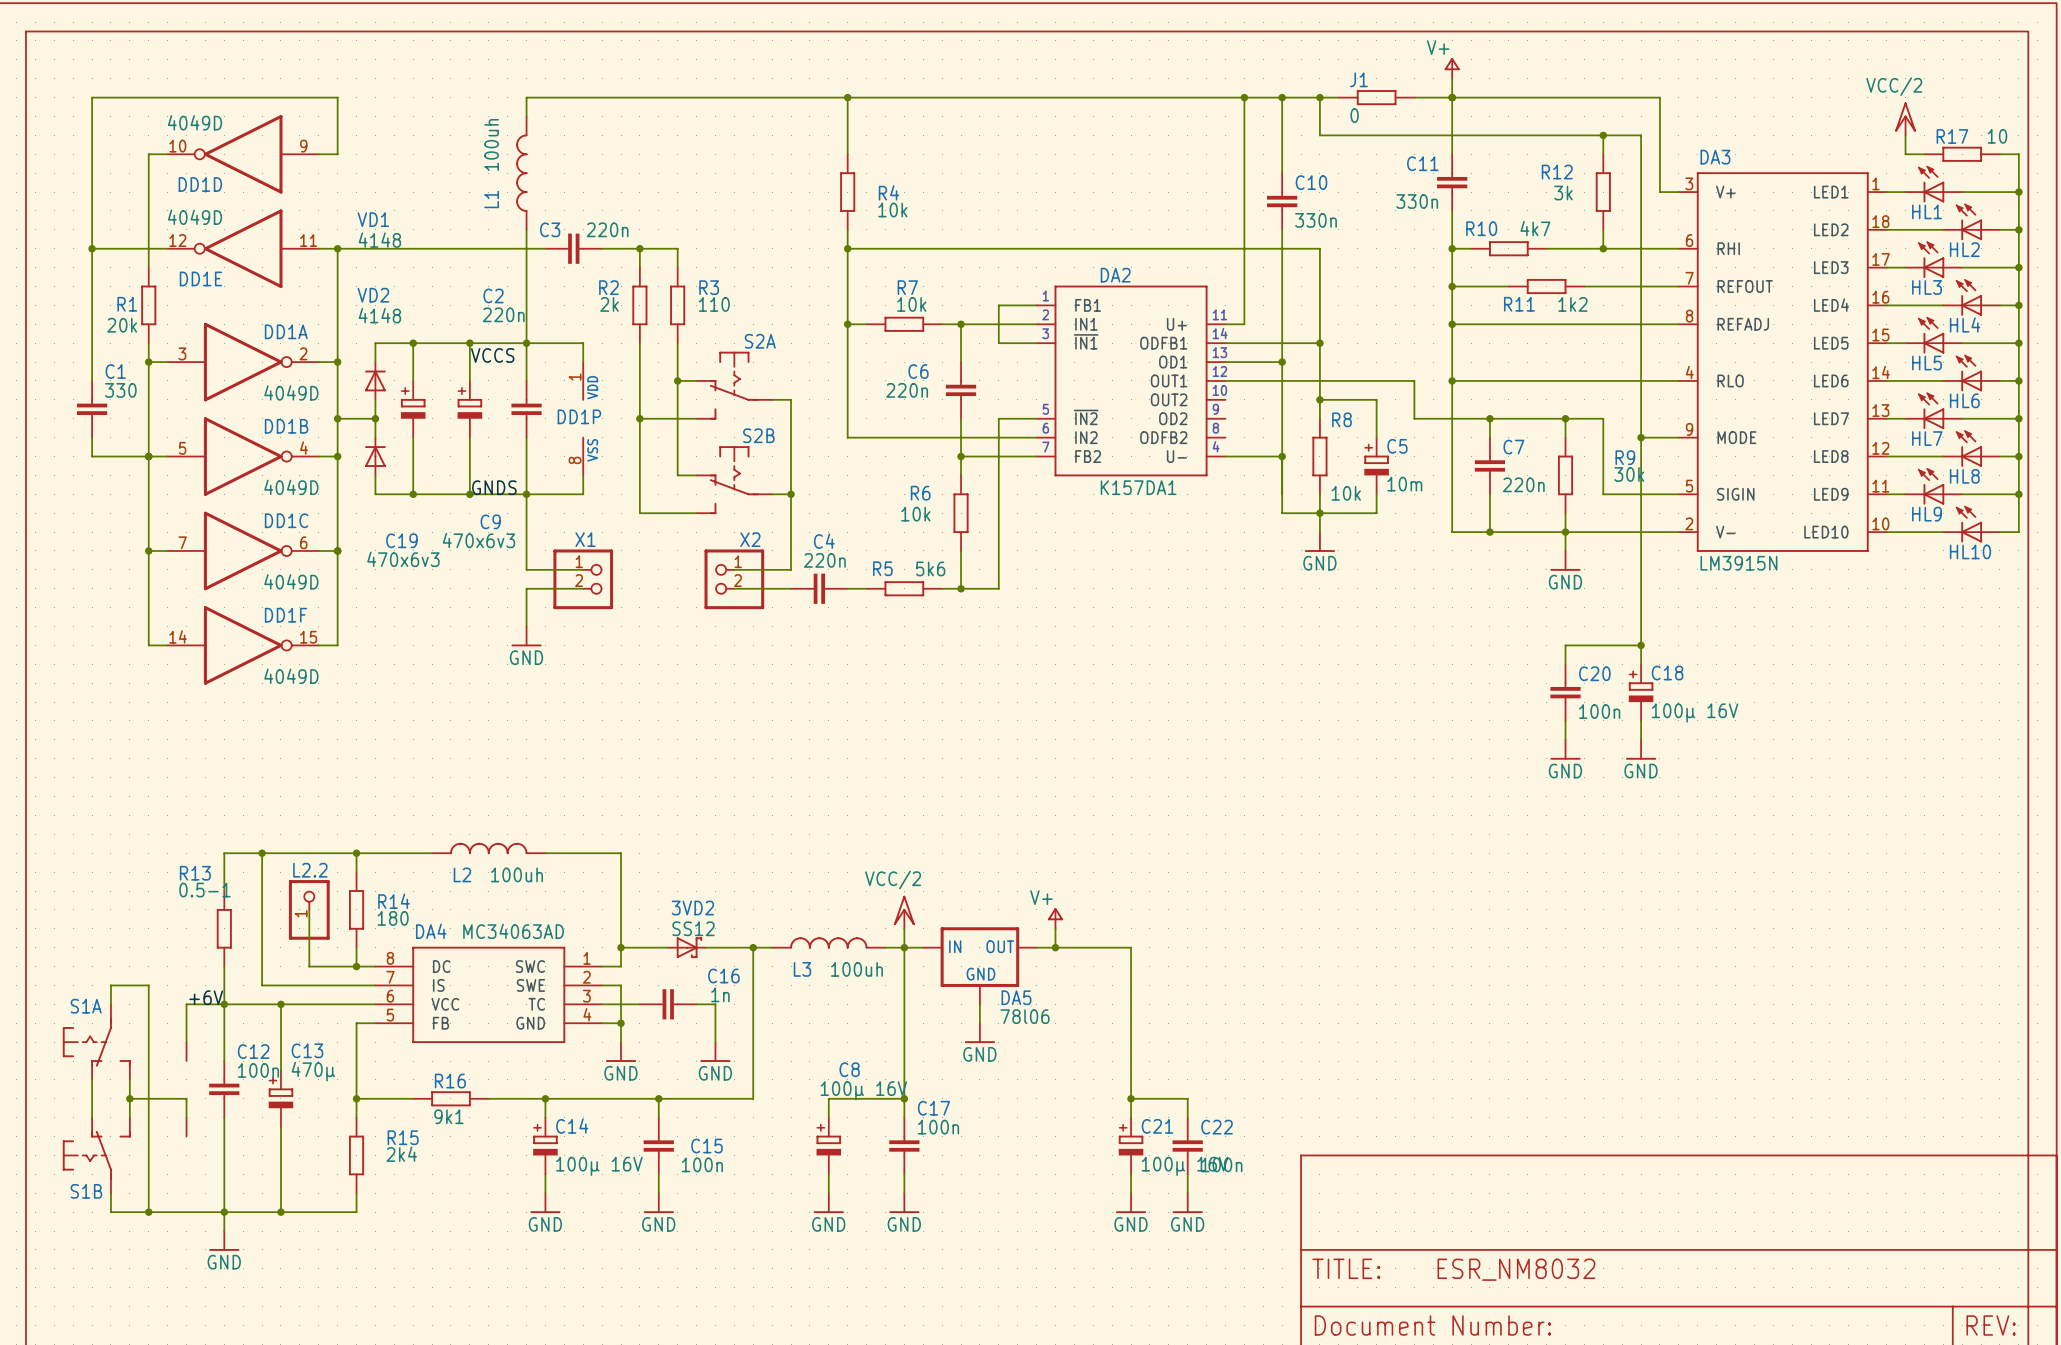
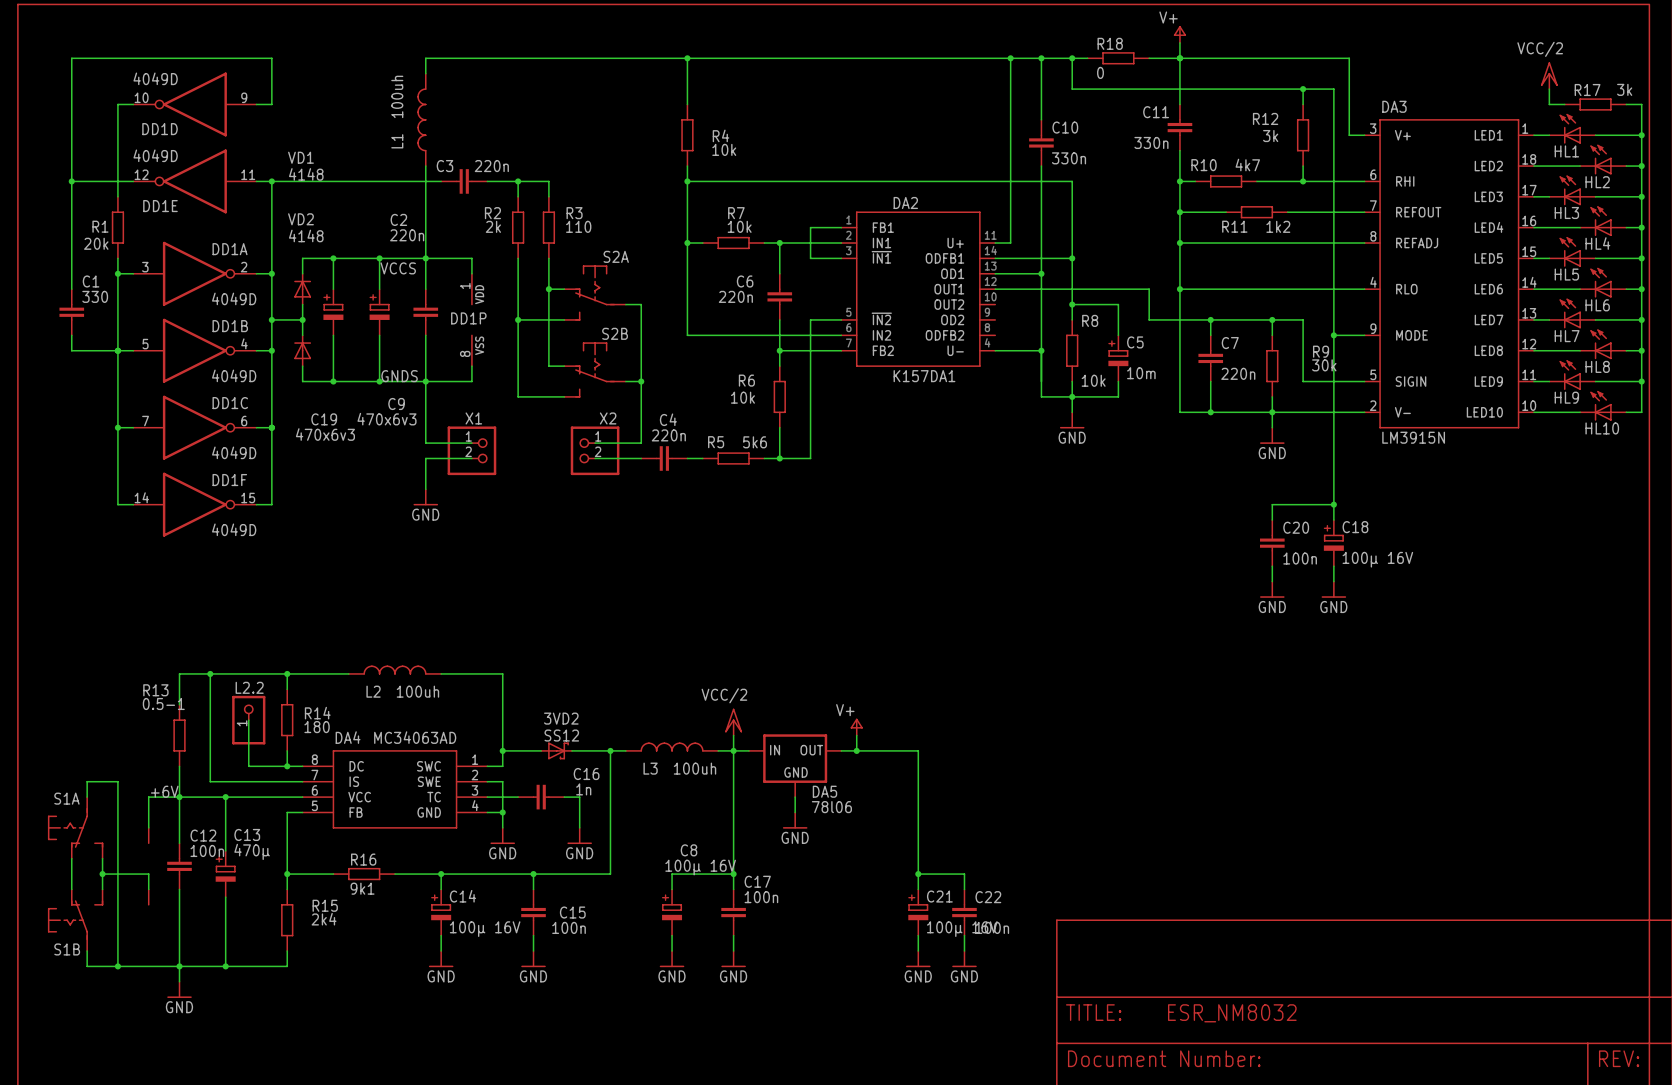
J1 name: J1 (1358, 79) -> R18 (1110, 43)
R17 value: 10 (1997, 136) -> 3k (1624, 89)

